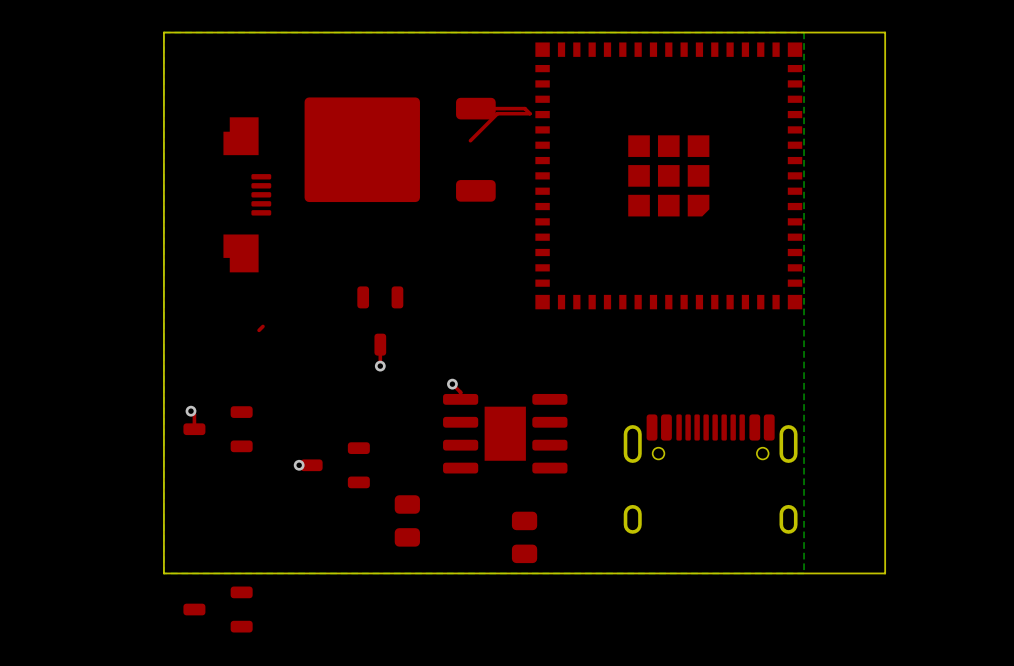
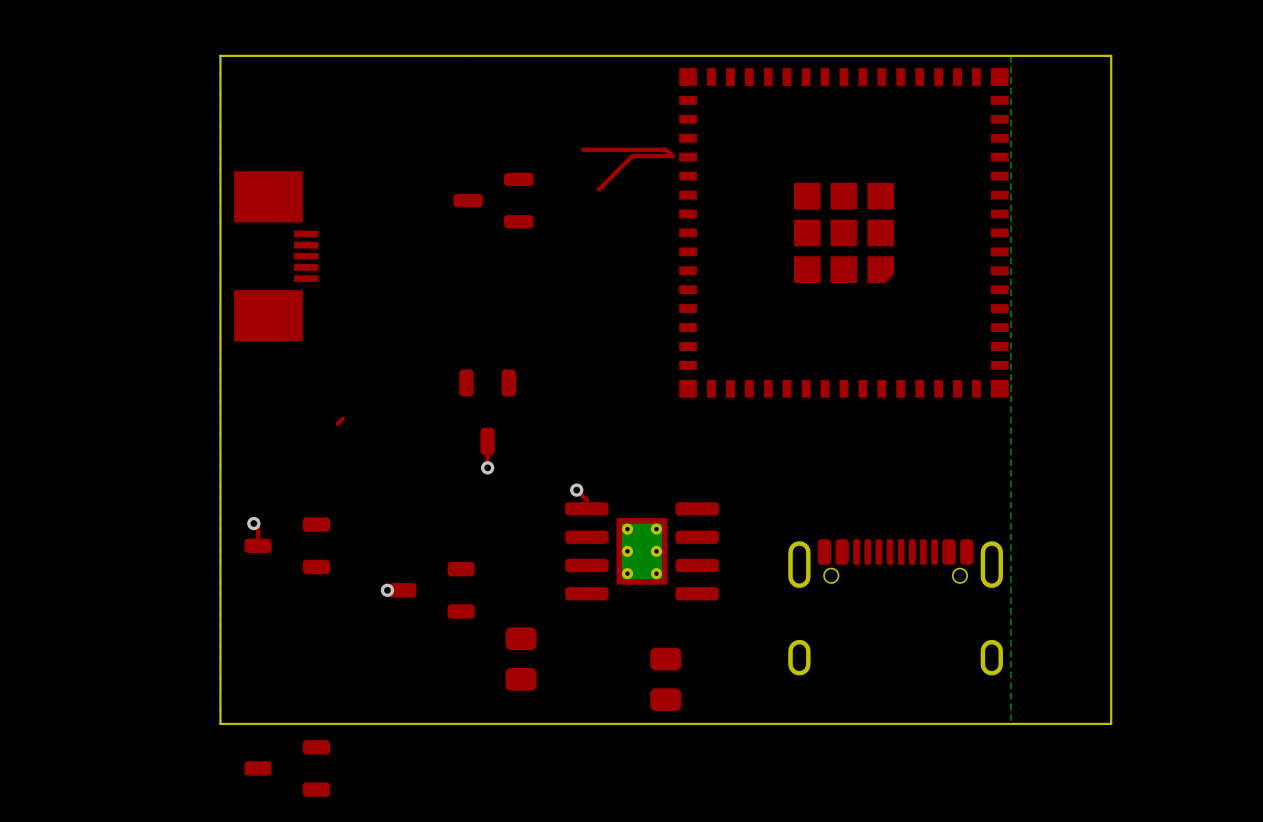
part footprint: [304, 97, 496, 203] -> [453, 172, 534, 229]
part: none -> (276, 256)
part: (247, 194) -> none
part footprint: [443, 393, 568, 474] -> [565, 502, 719, 601]
part footprint: [623, 414, 798, 534] -> [788, 539, 1003, 676]

